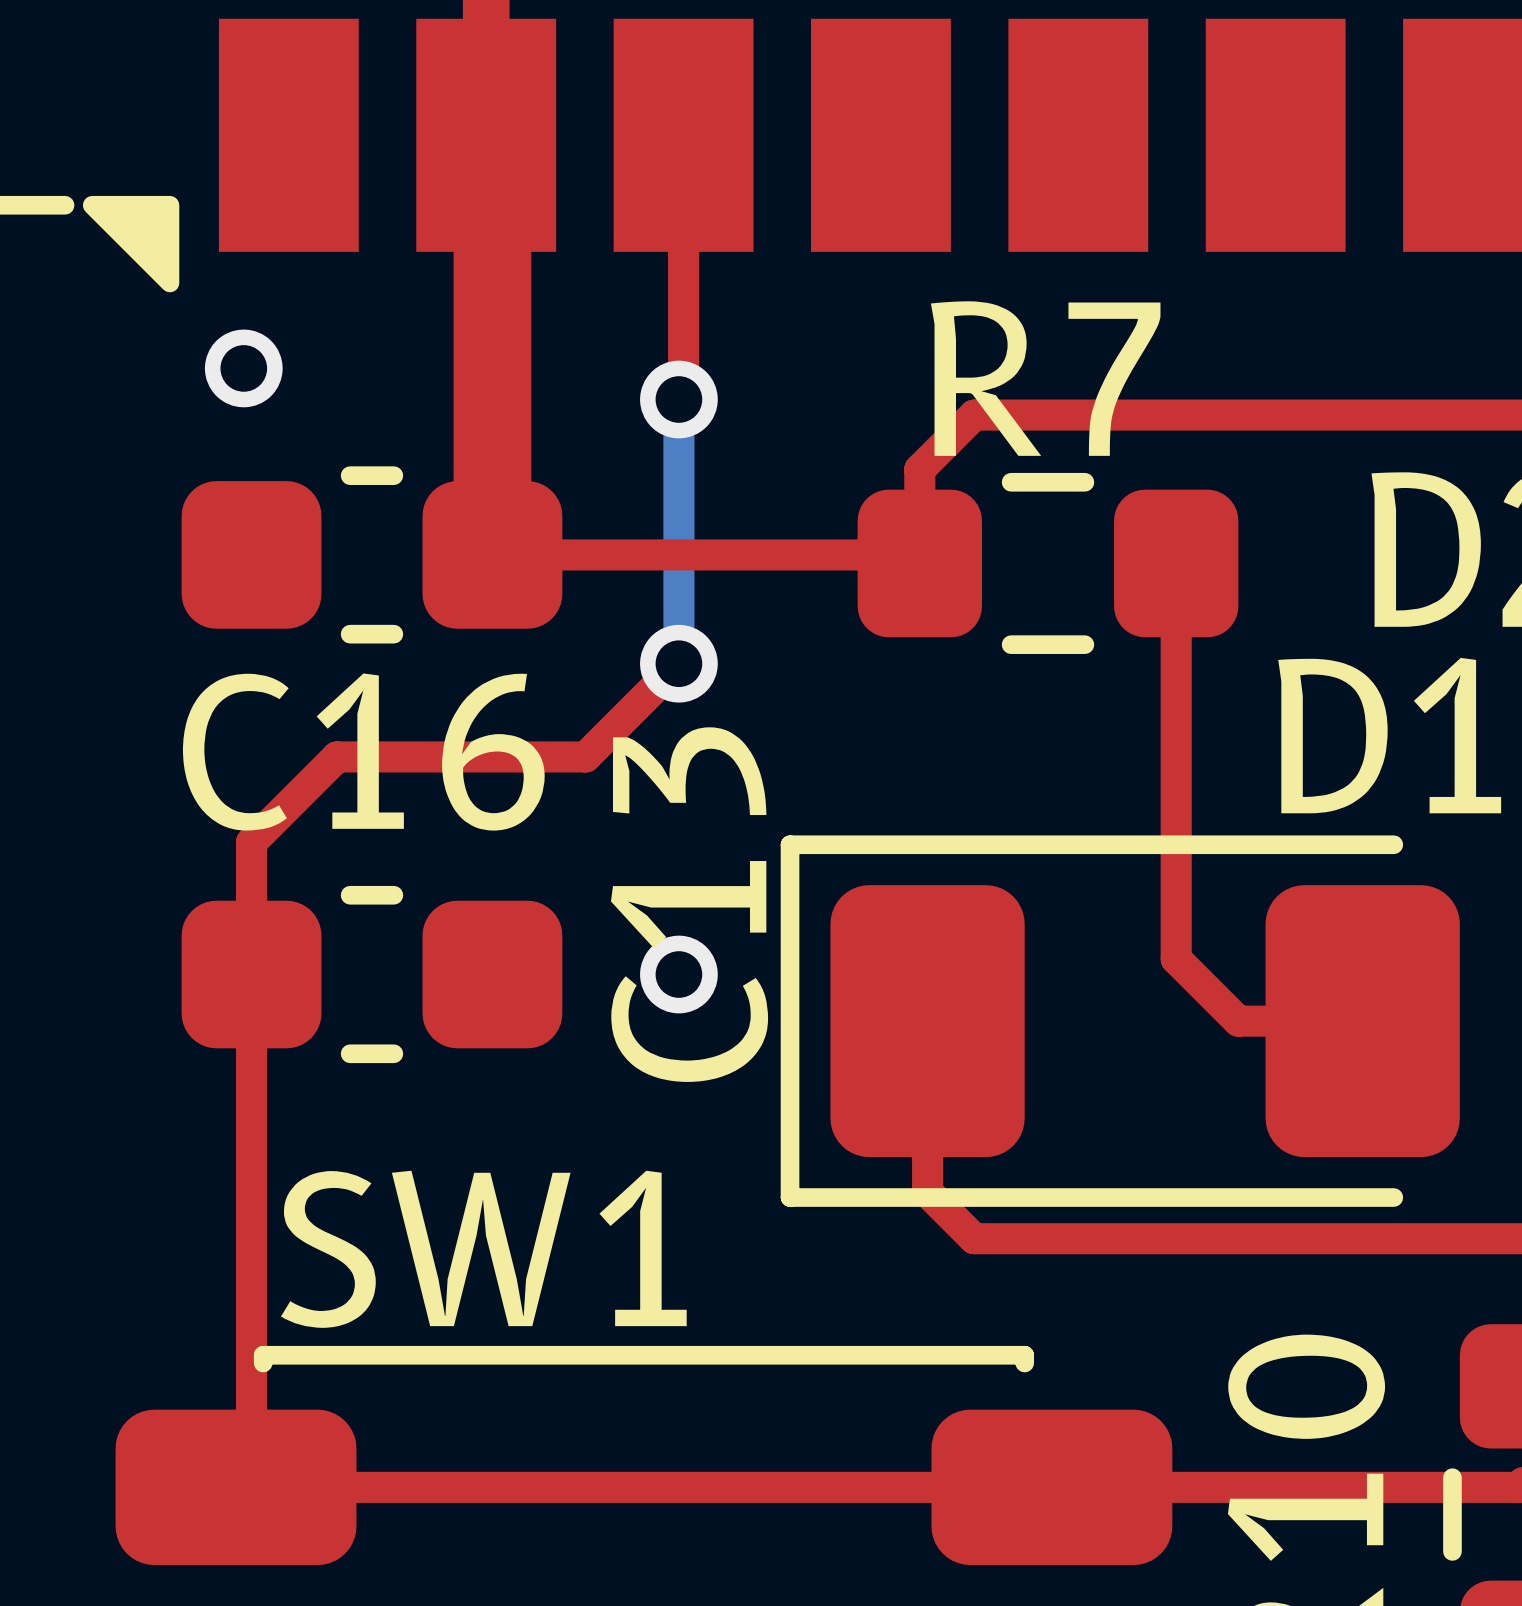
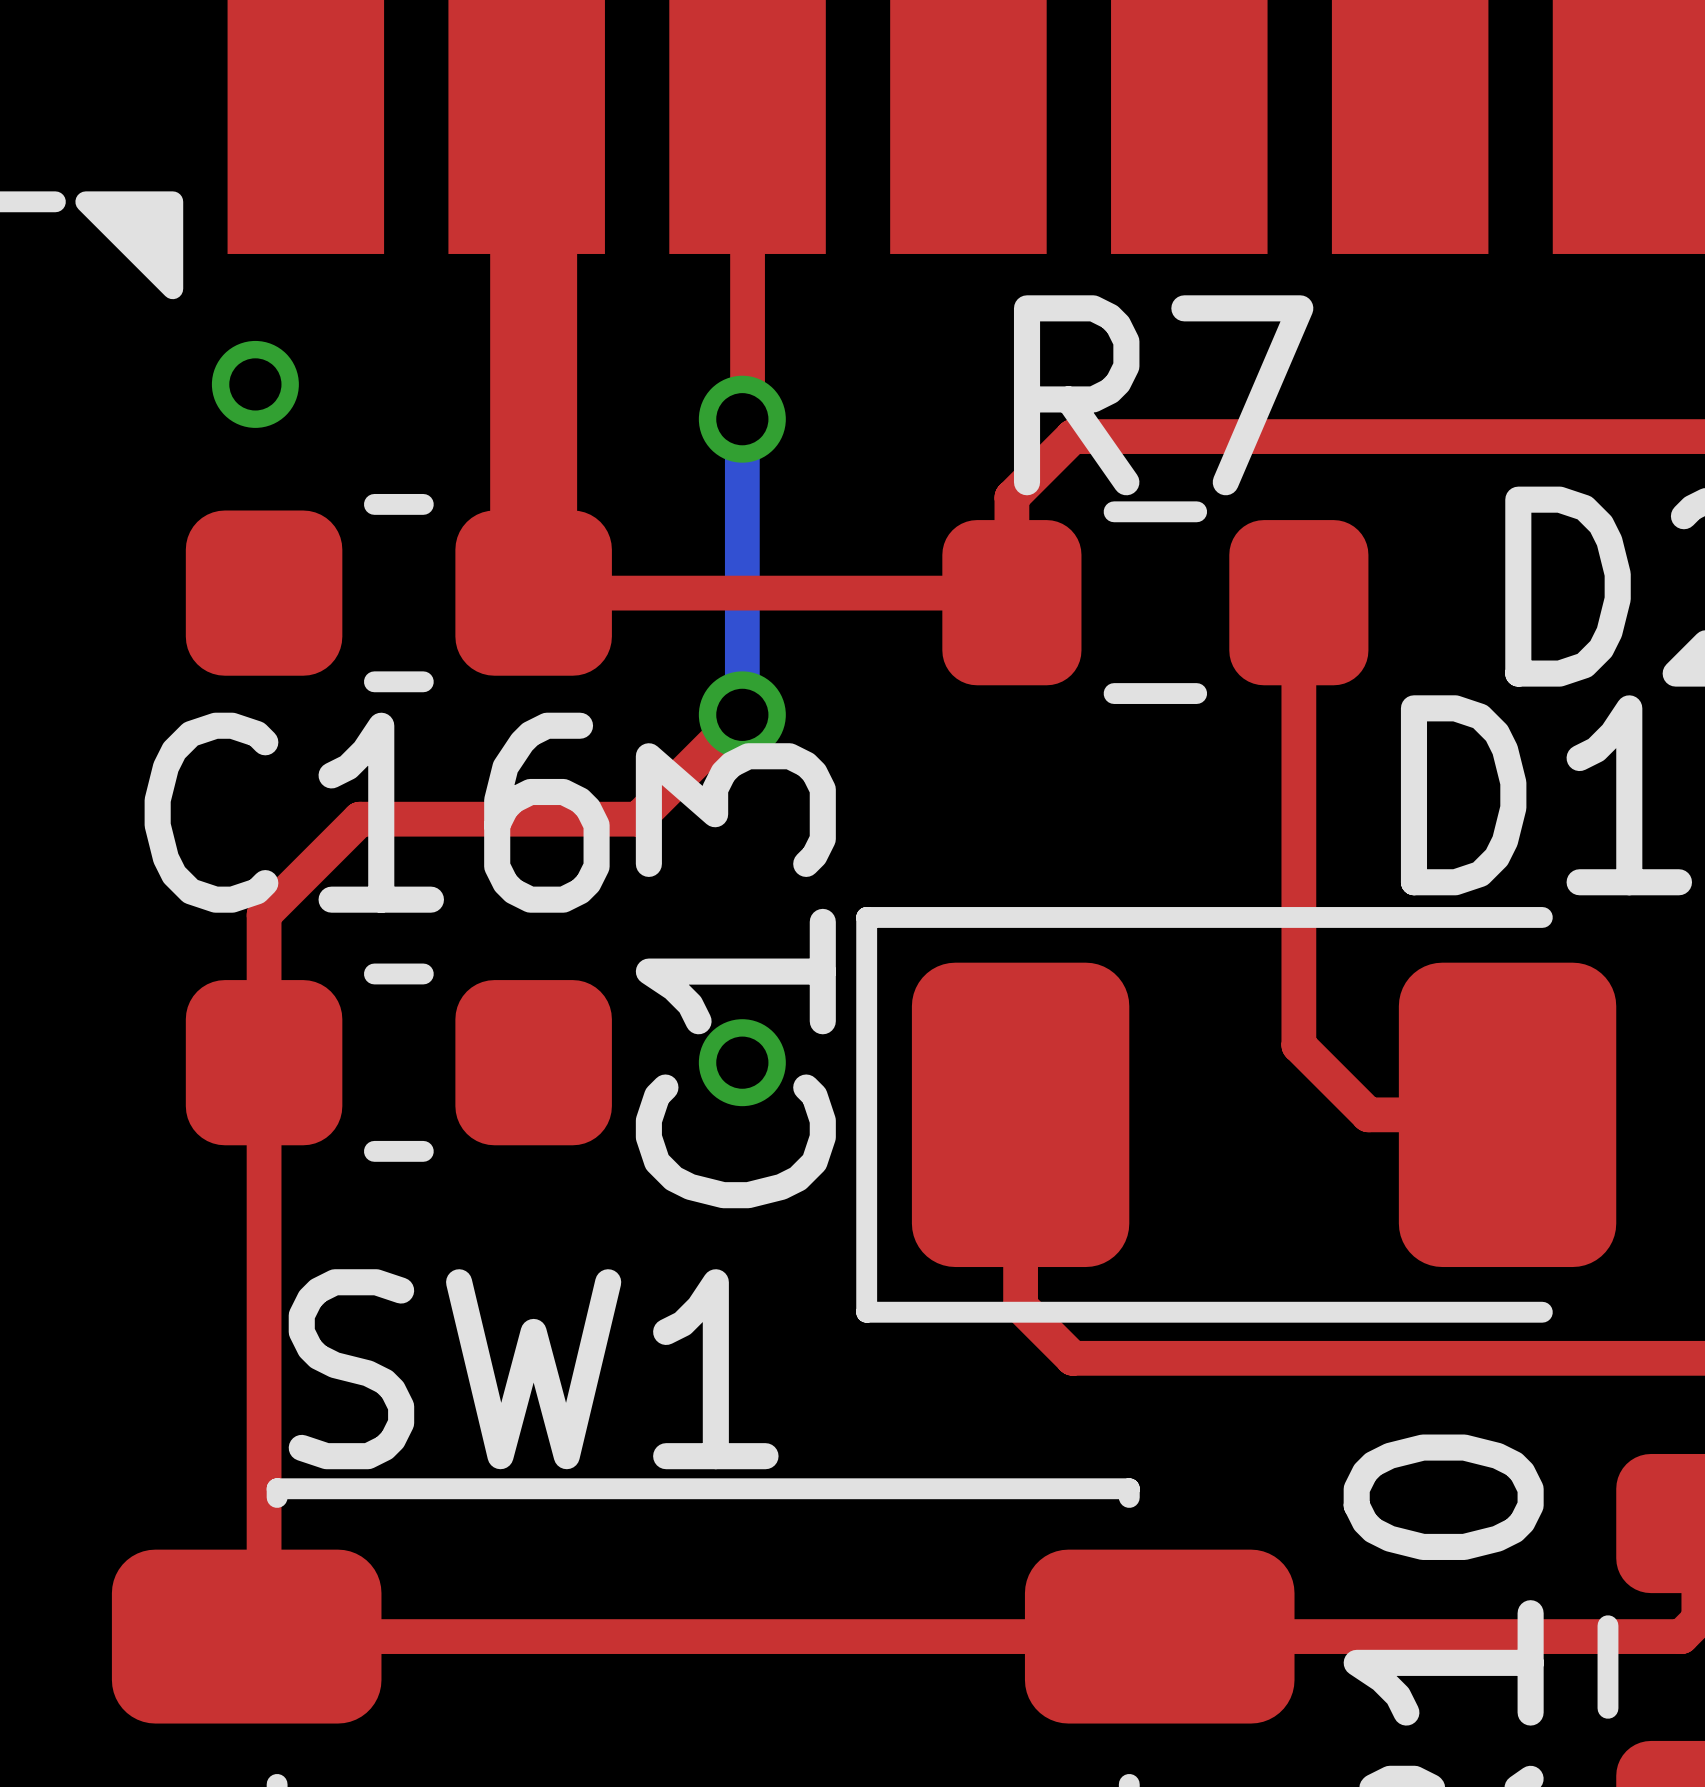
C16 name position: C16 (363, 752) -> C16 (377, 812)
C13 name position: C13 (689, 904) -> C13 (735, 975)

